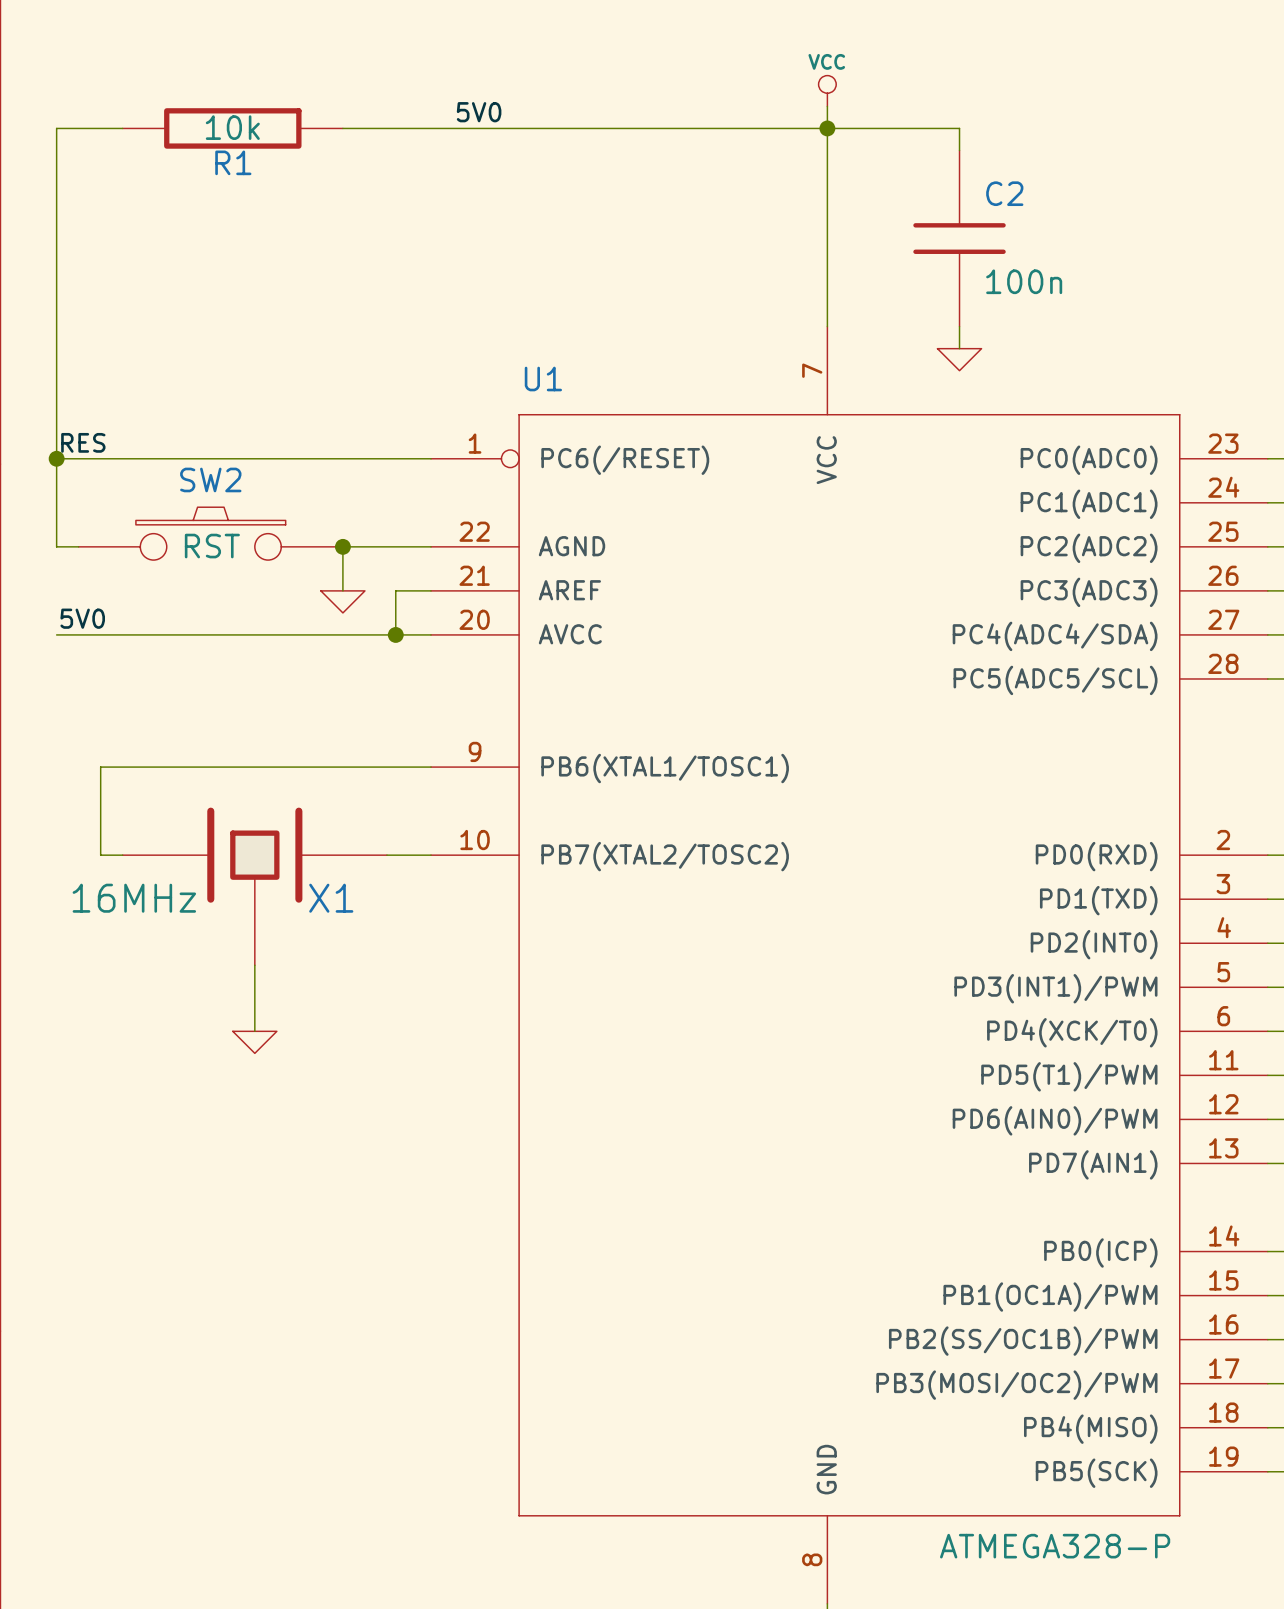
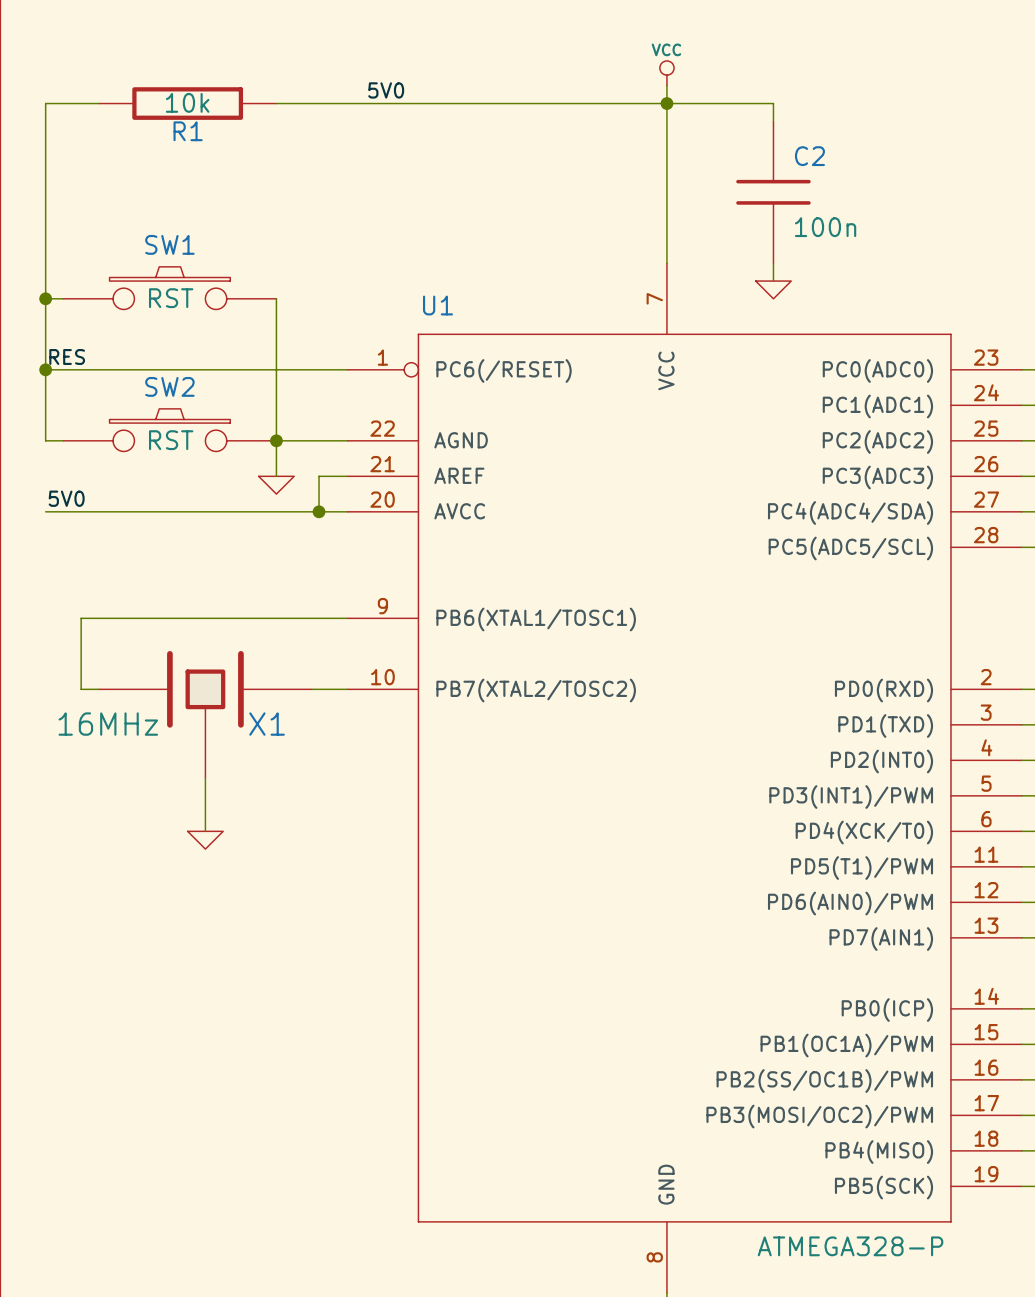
SW1: none -> RST (169, 288)
wire: none -> (45, 298) (63, 298)
junction: none -> (45, 298)
wire: none -> (276, 298) (276, 440)

